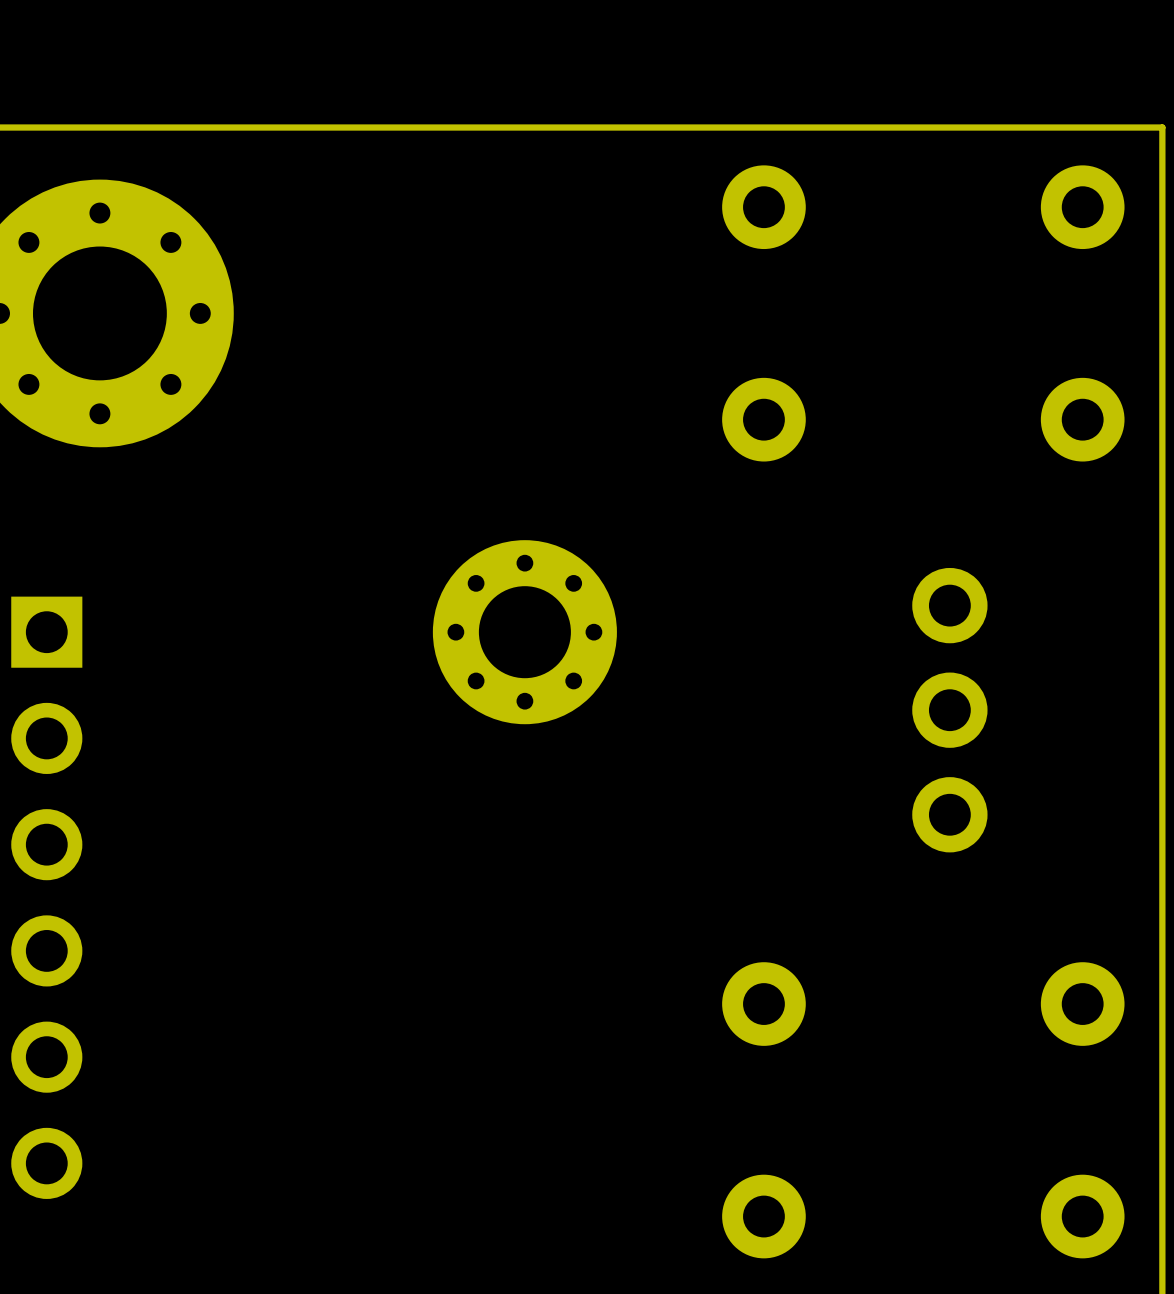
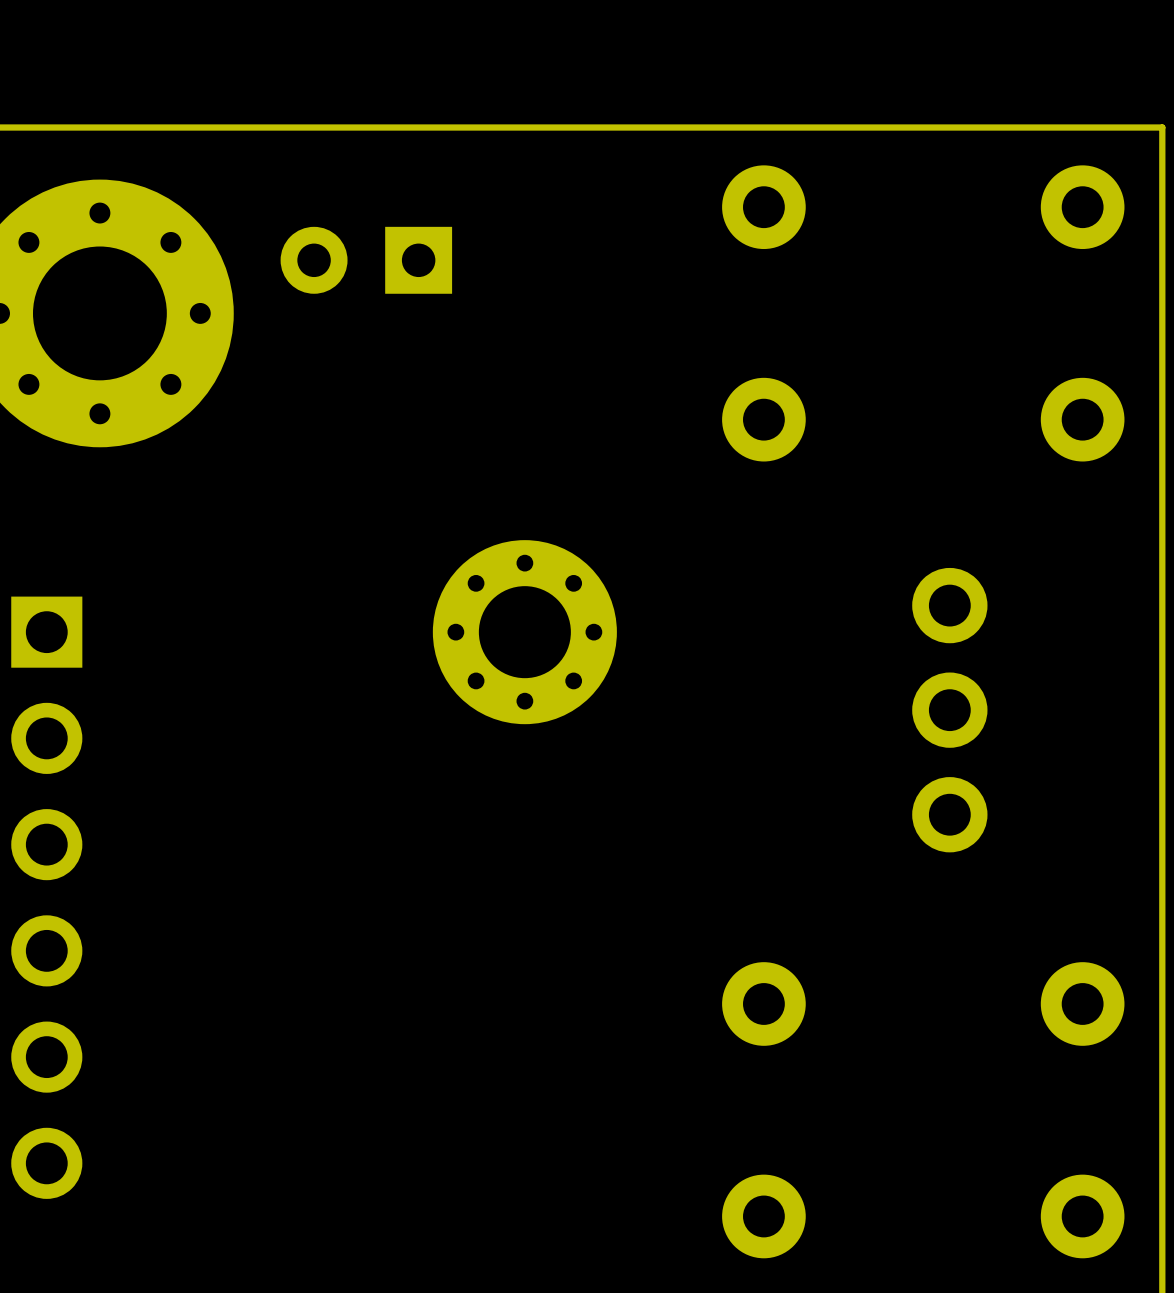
part: none -> (366, 260)

